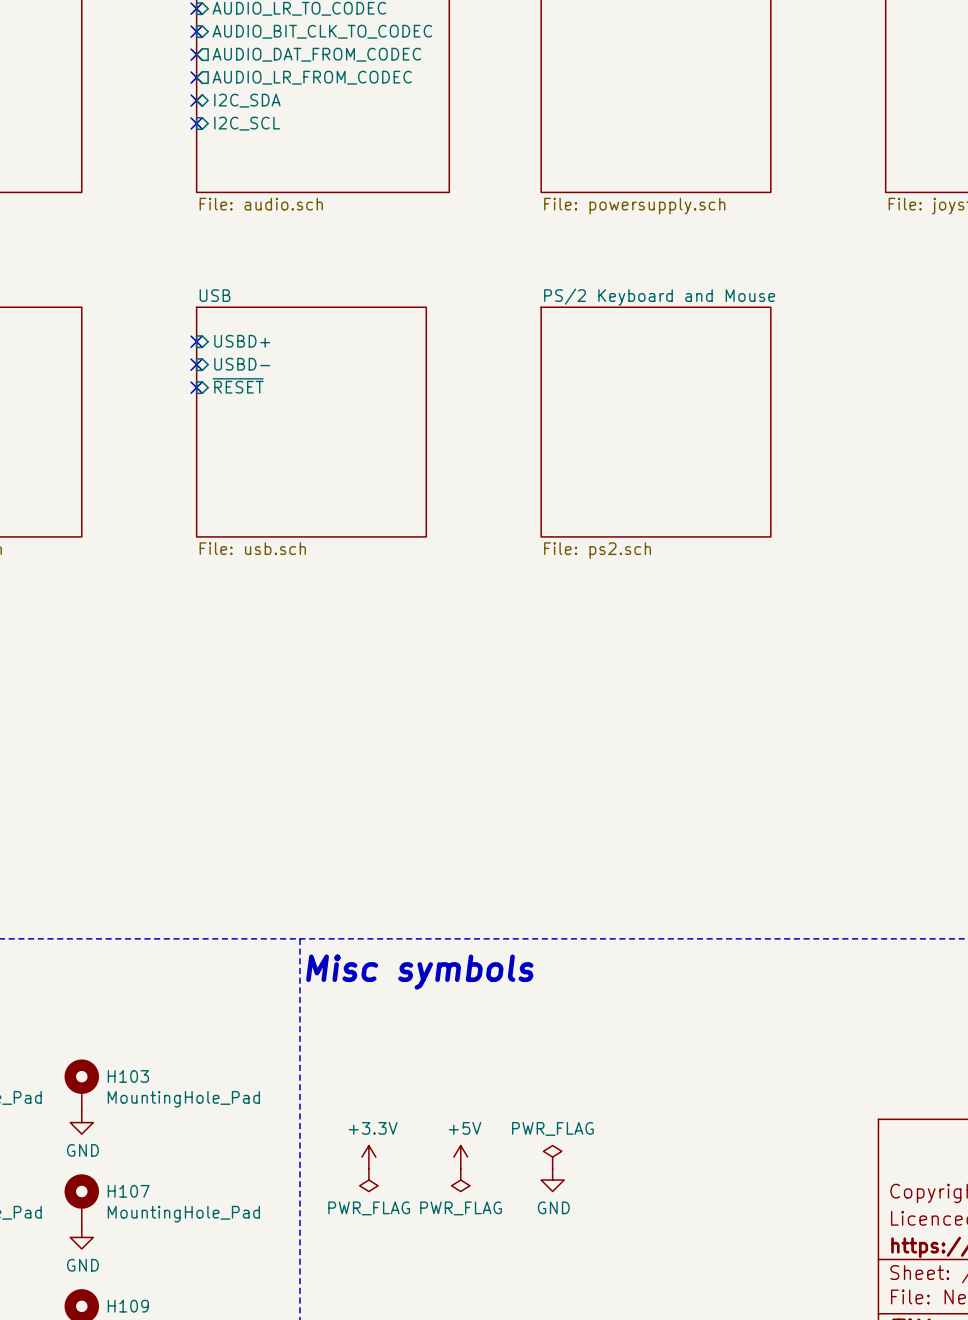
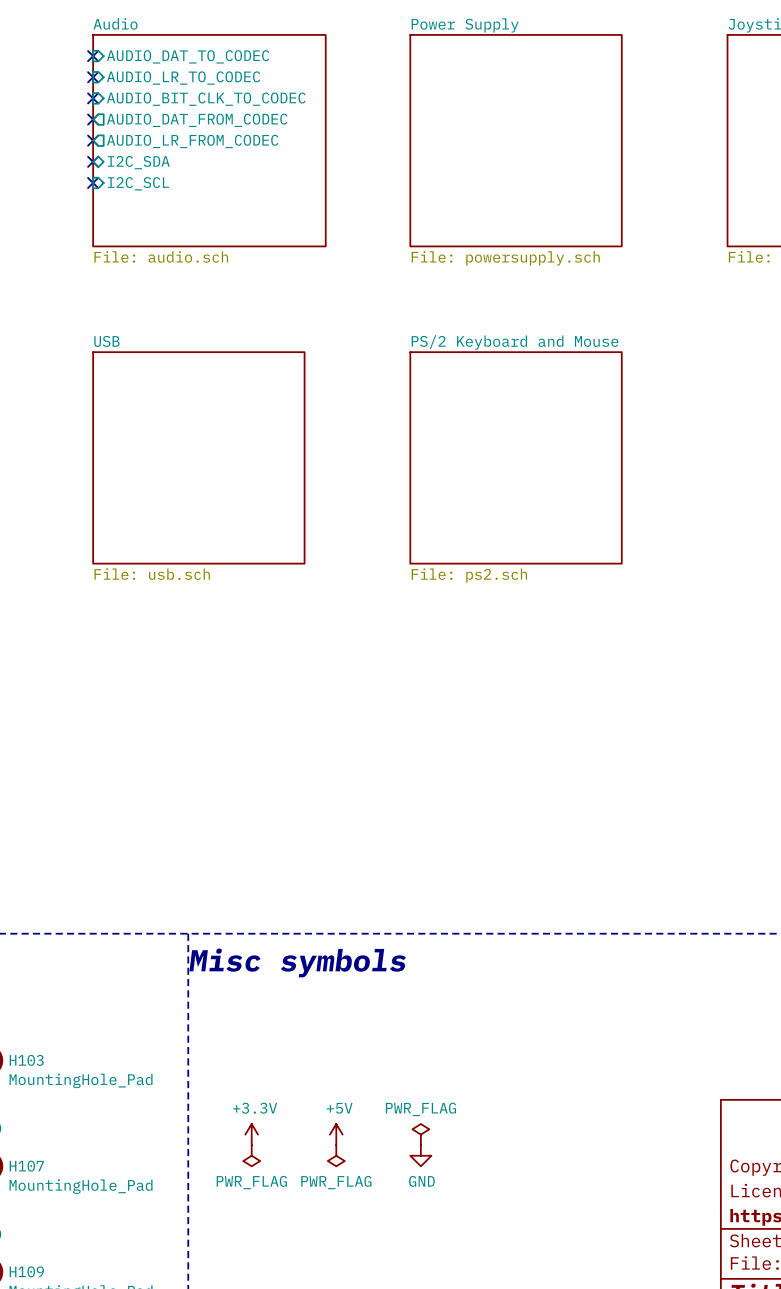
no-connect mark: (196, 341) -> none
sheet pin: USBD+ (242, 341) -> none
no-connect mark: (196, 364) -> none
sheet pin: USBD- (242, 364) -> none
sheet pin: ~{RESET} (238, 385) -> none
no-connect mark: (196, 387) -> none

